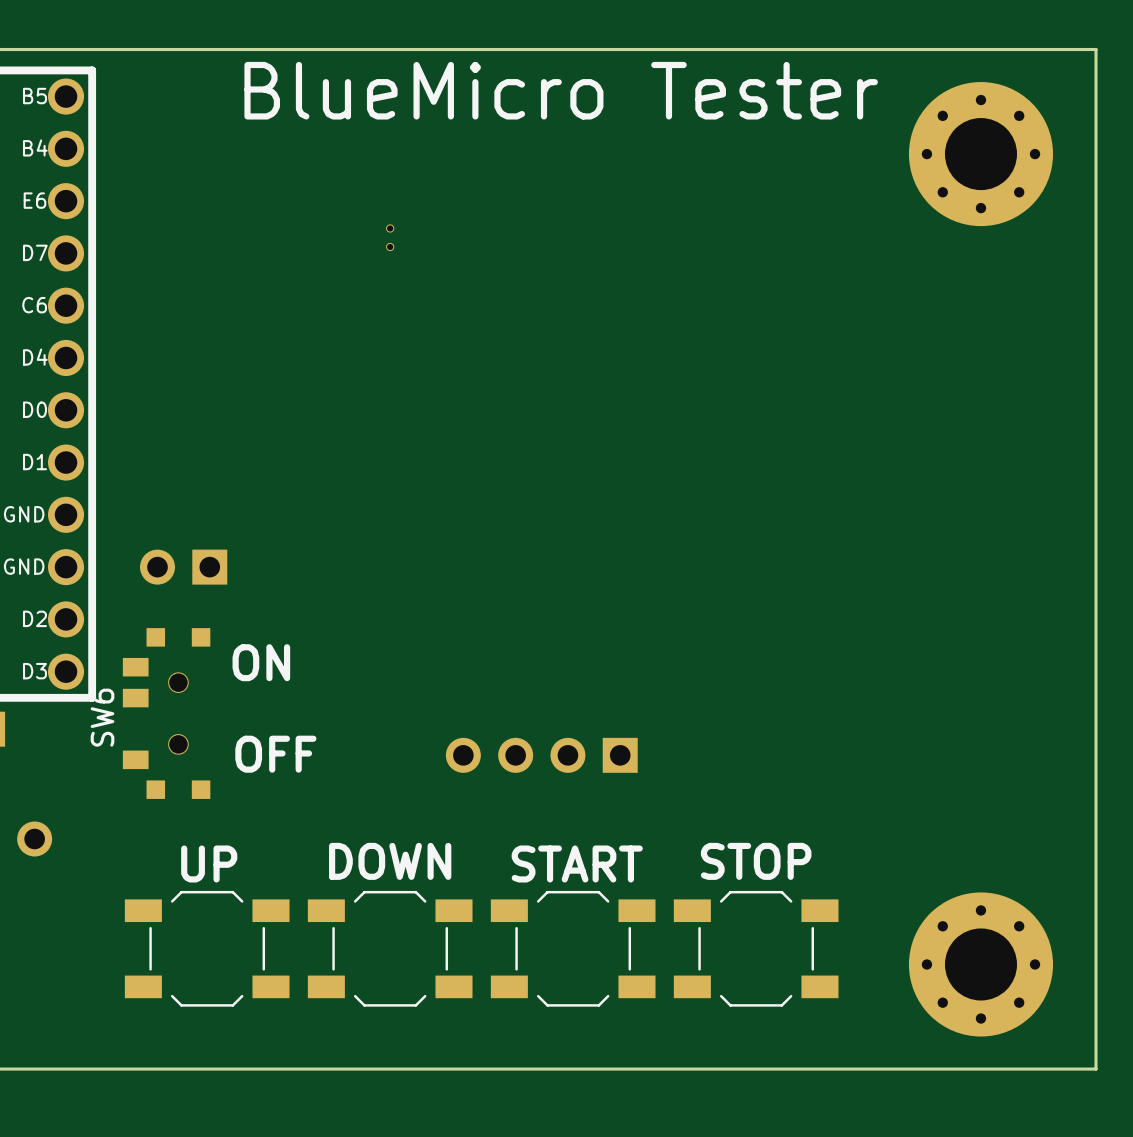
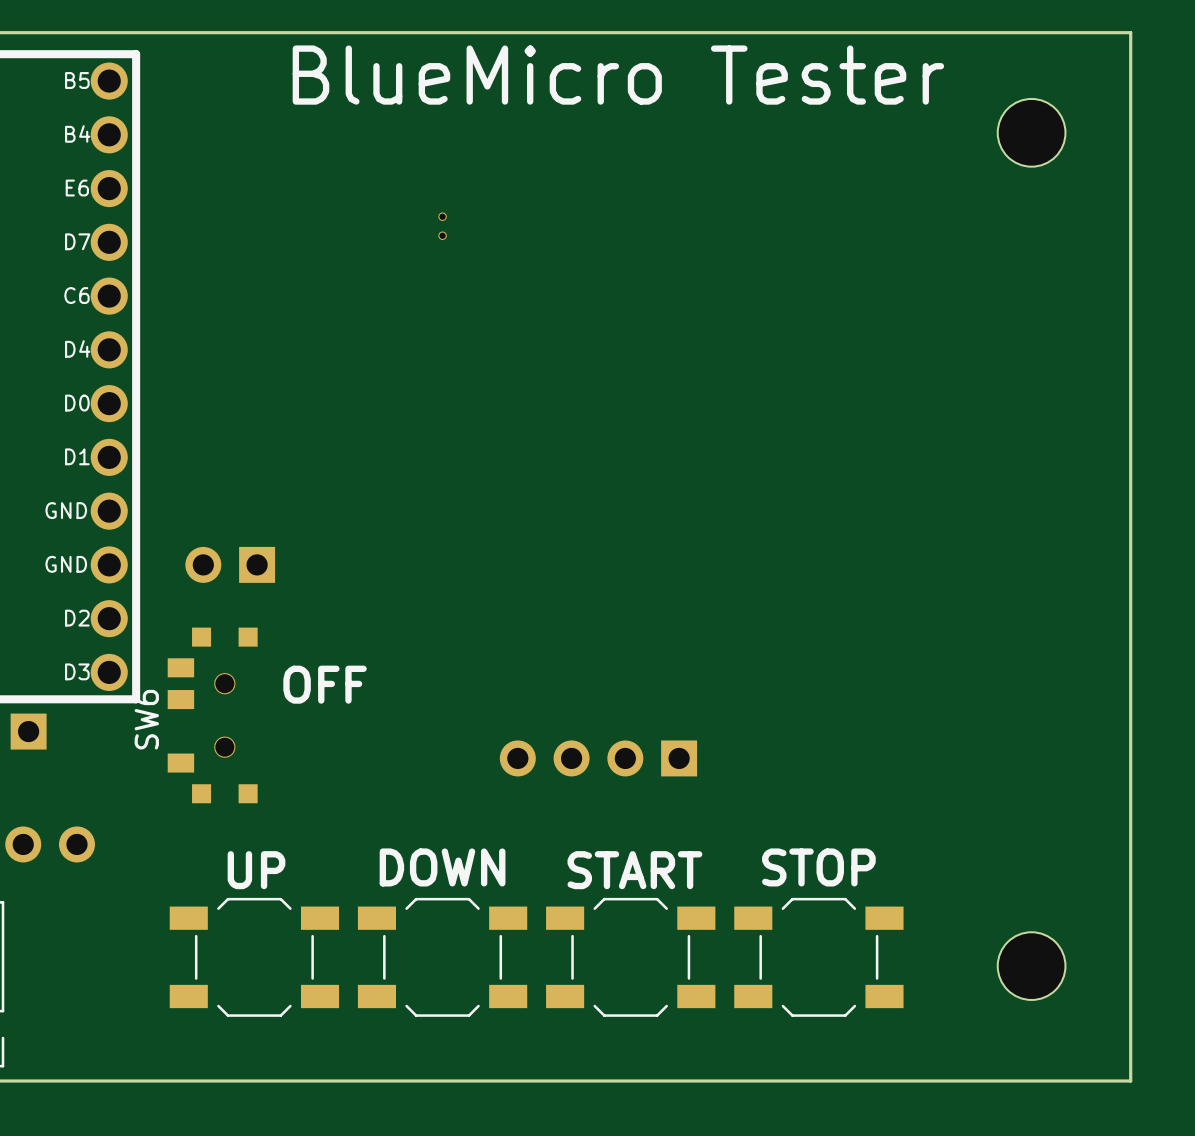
board edge: (1059, 49) (1096, 49) (1096, 1069) (1059, 1069) -> (1130, 32) (1130, 1081)
part footprint: [908, 82, 1054, 227] -> [997, 98, 1066, 167]
text: ON (261, 662) -> none
text position: OFF (275, 754) -> OFF (325, 684)
part footprint: [908, 892, 1054, 1037] -> [997, 932, 1066, 1000]

